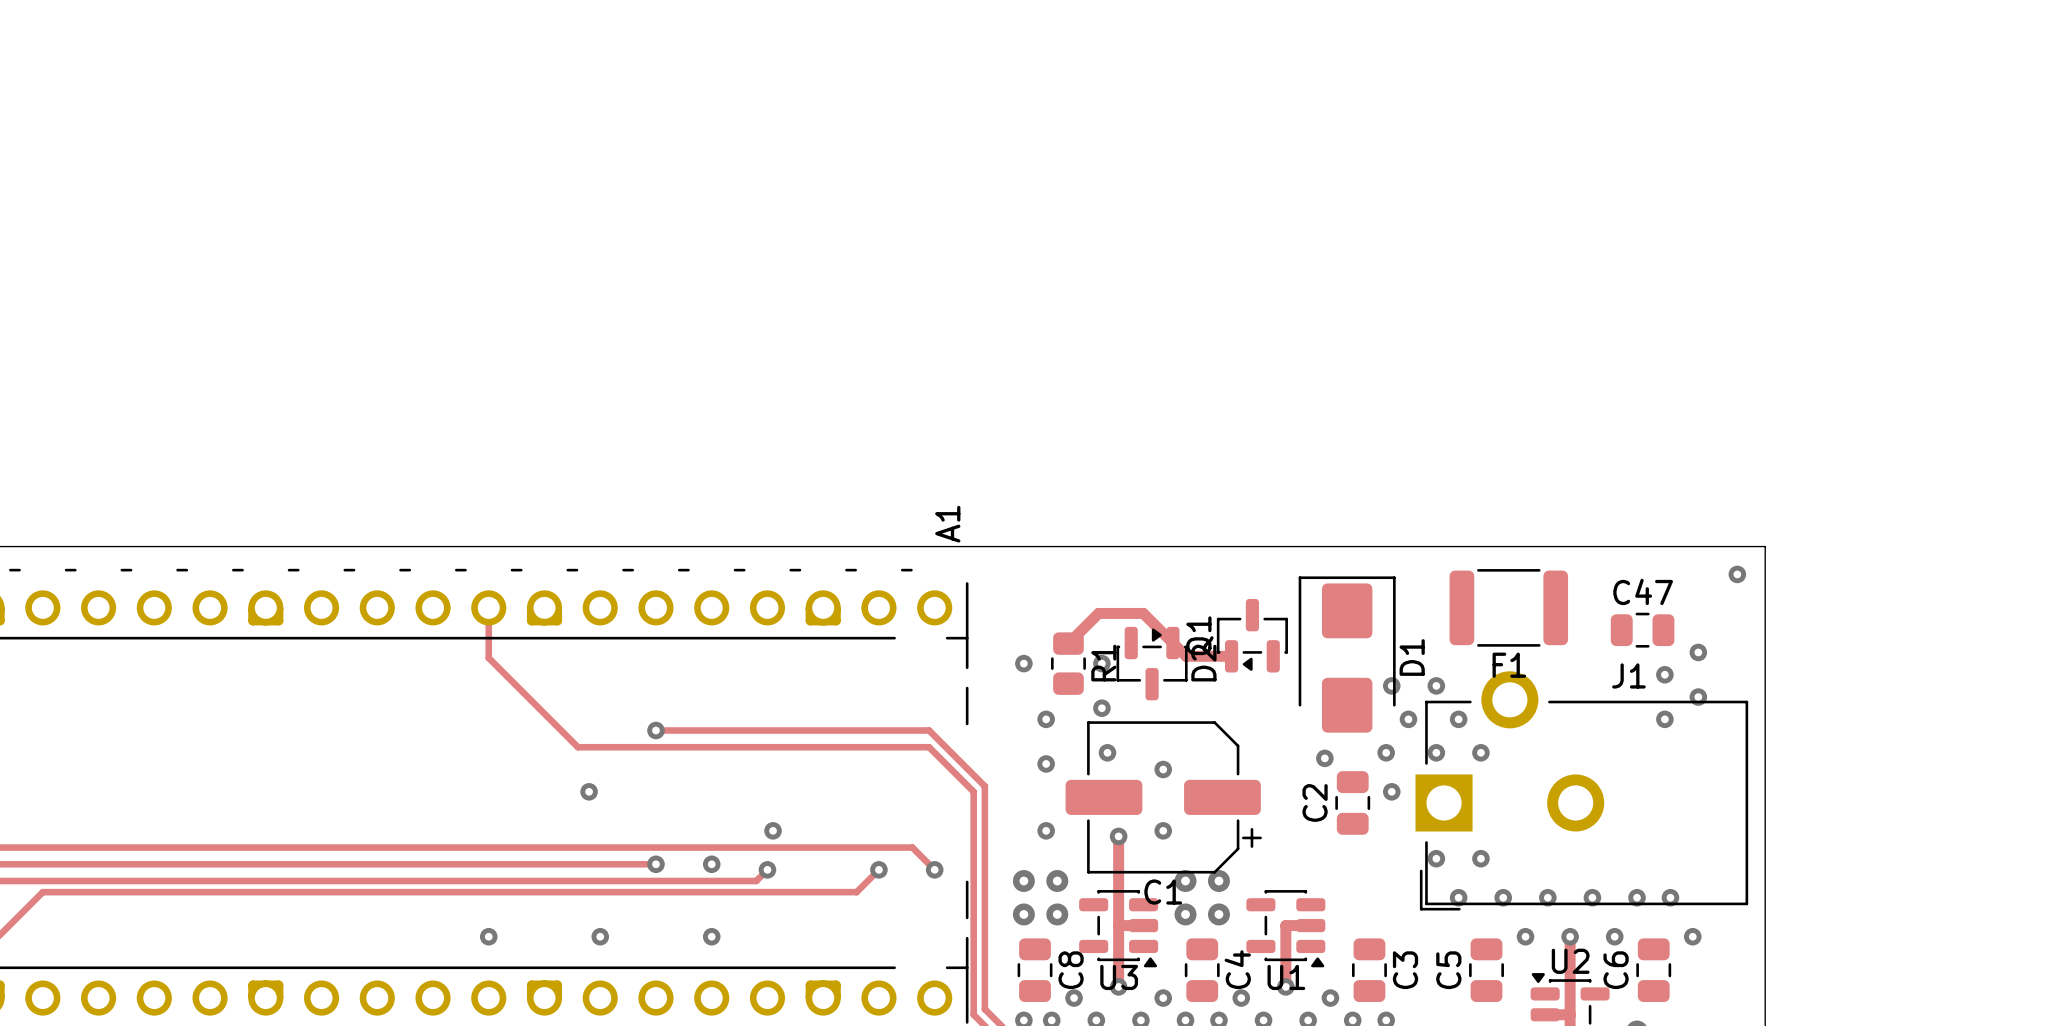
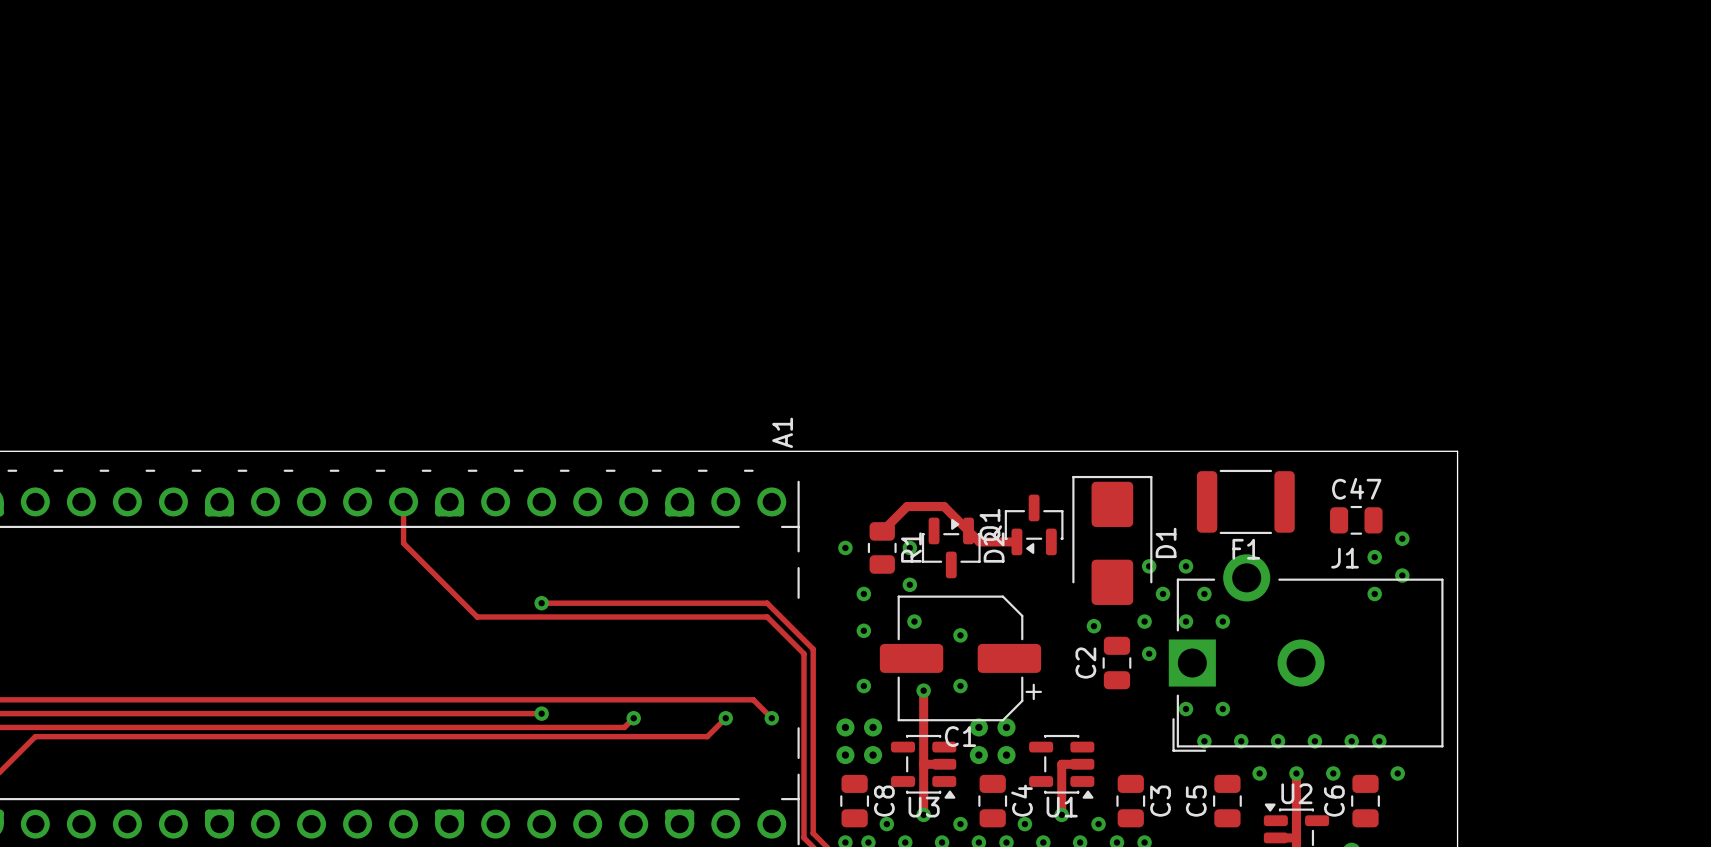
via: (1737, 574) -> none
via: (589, 791) -> none
via: (773, 830) -> none
via: (711, 864) -> none
via: (488, 936) -> none
via: (600, 936) -> none
via: (711, 936) -> none

